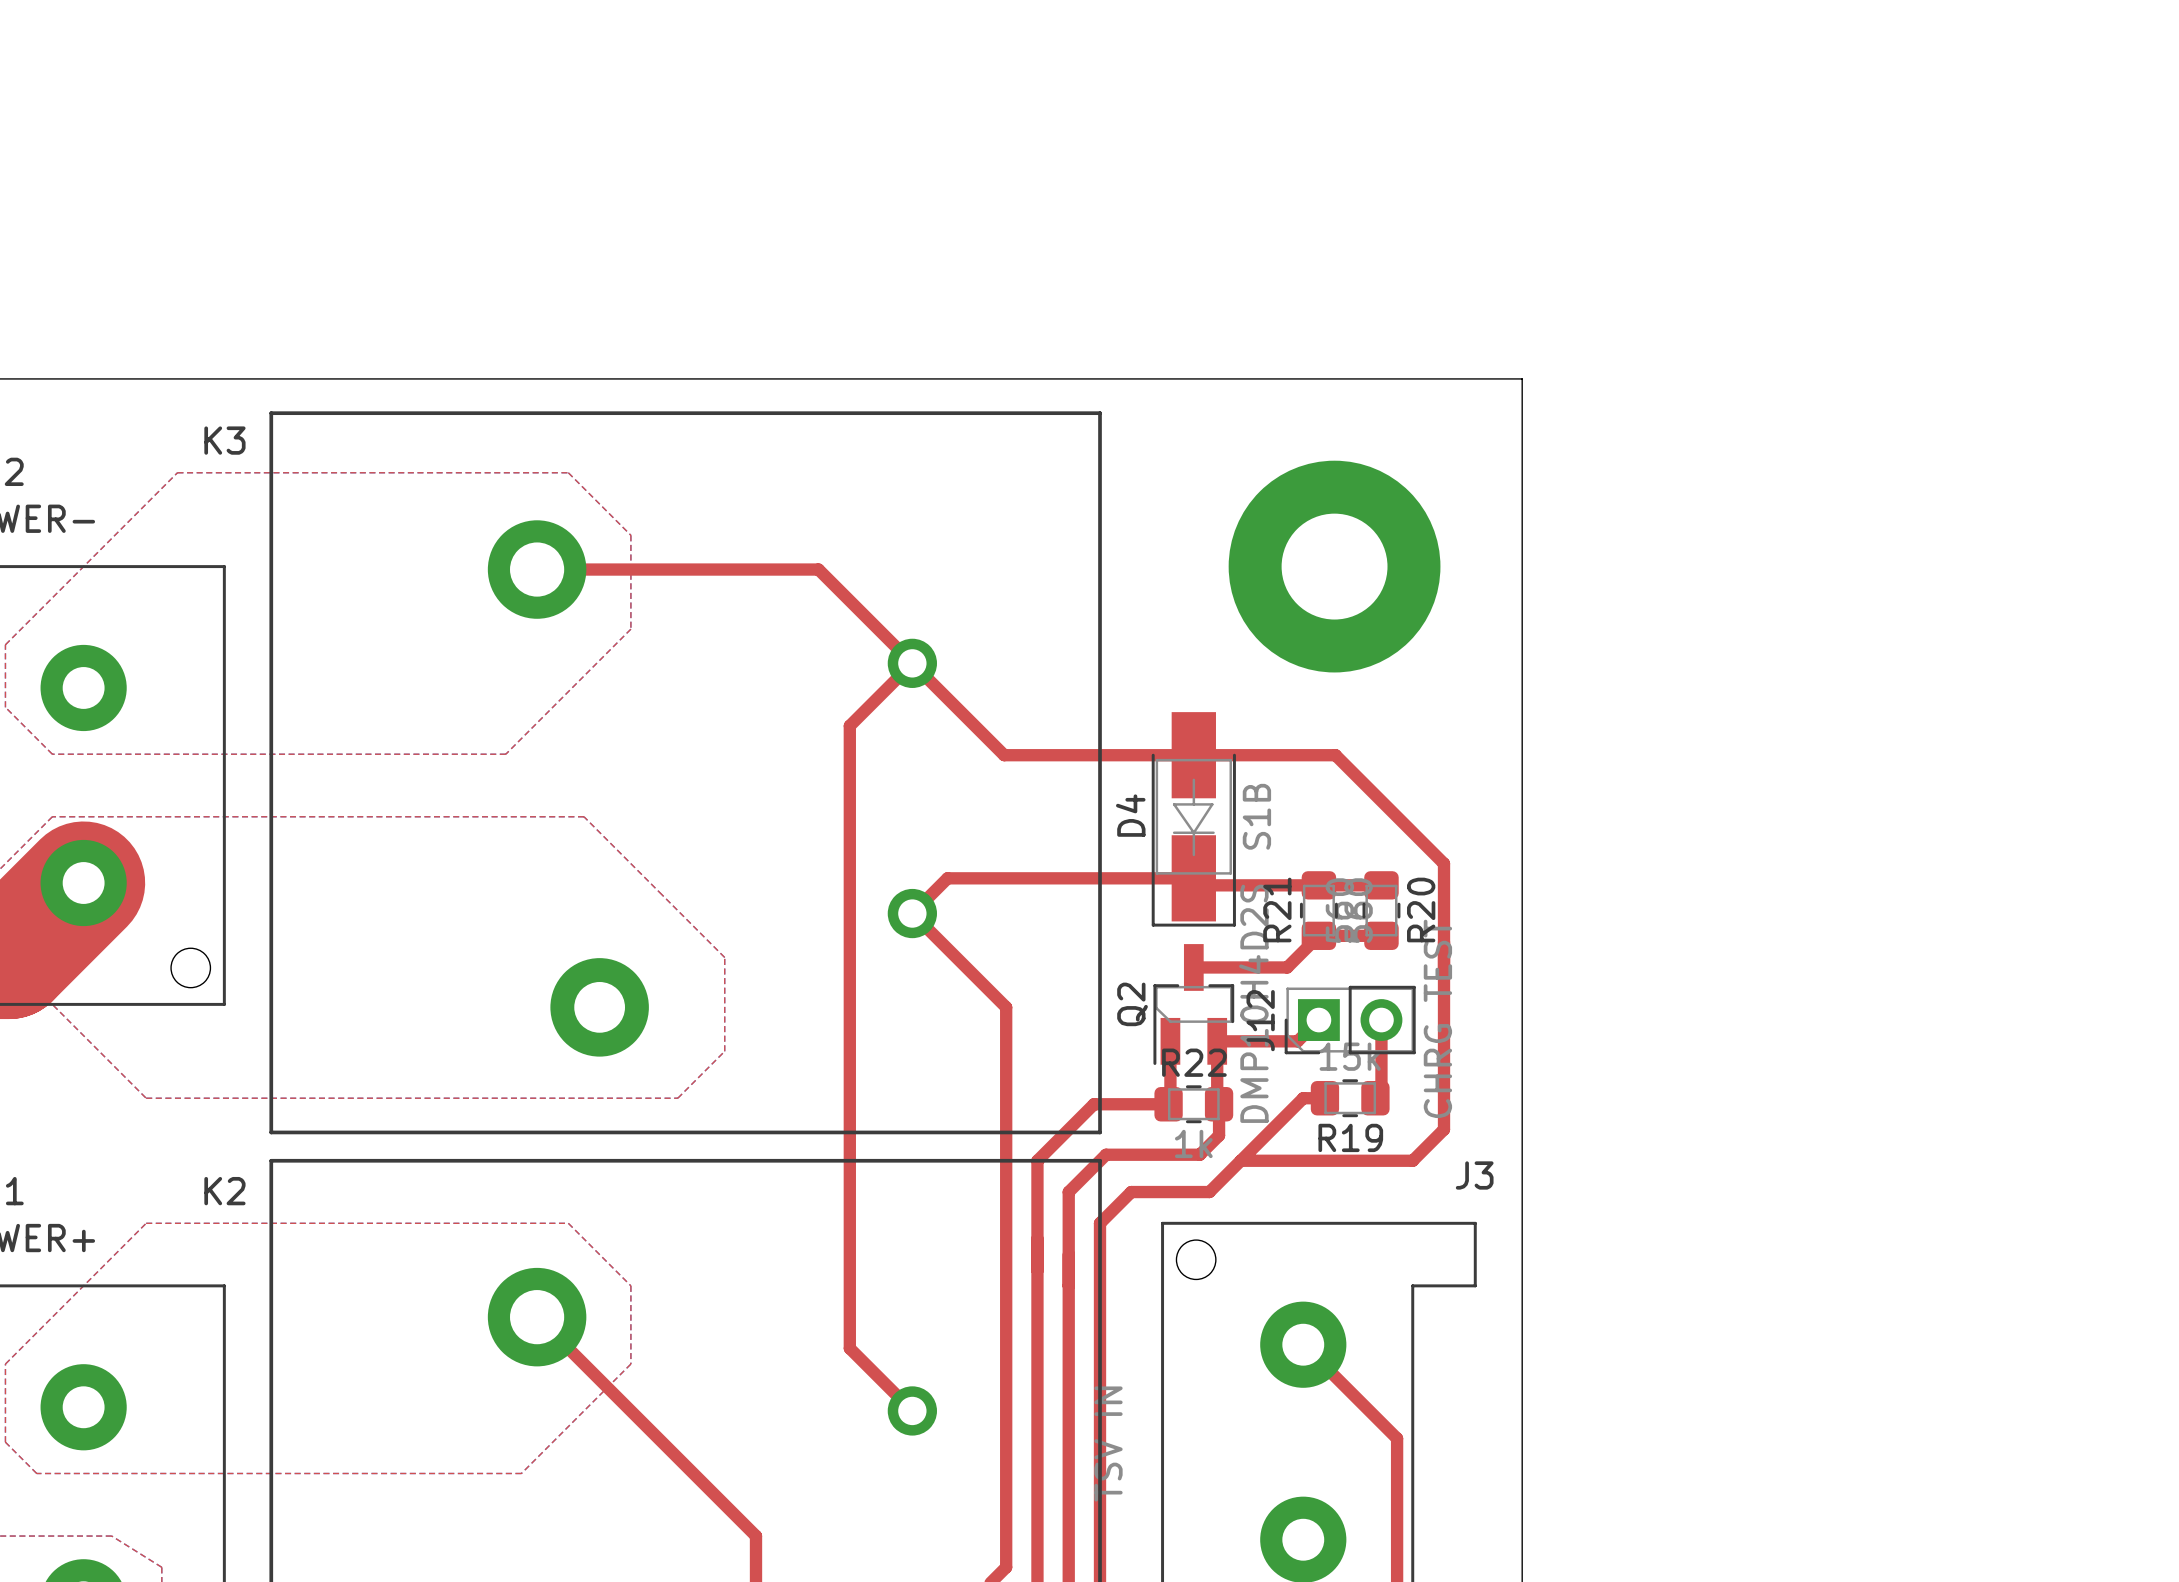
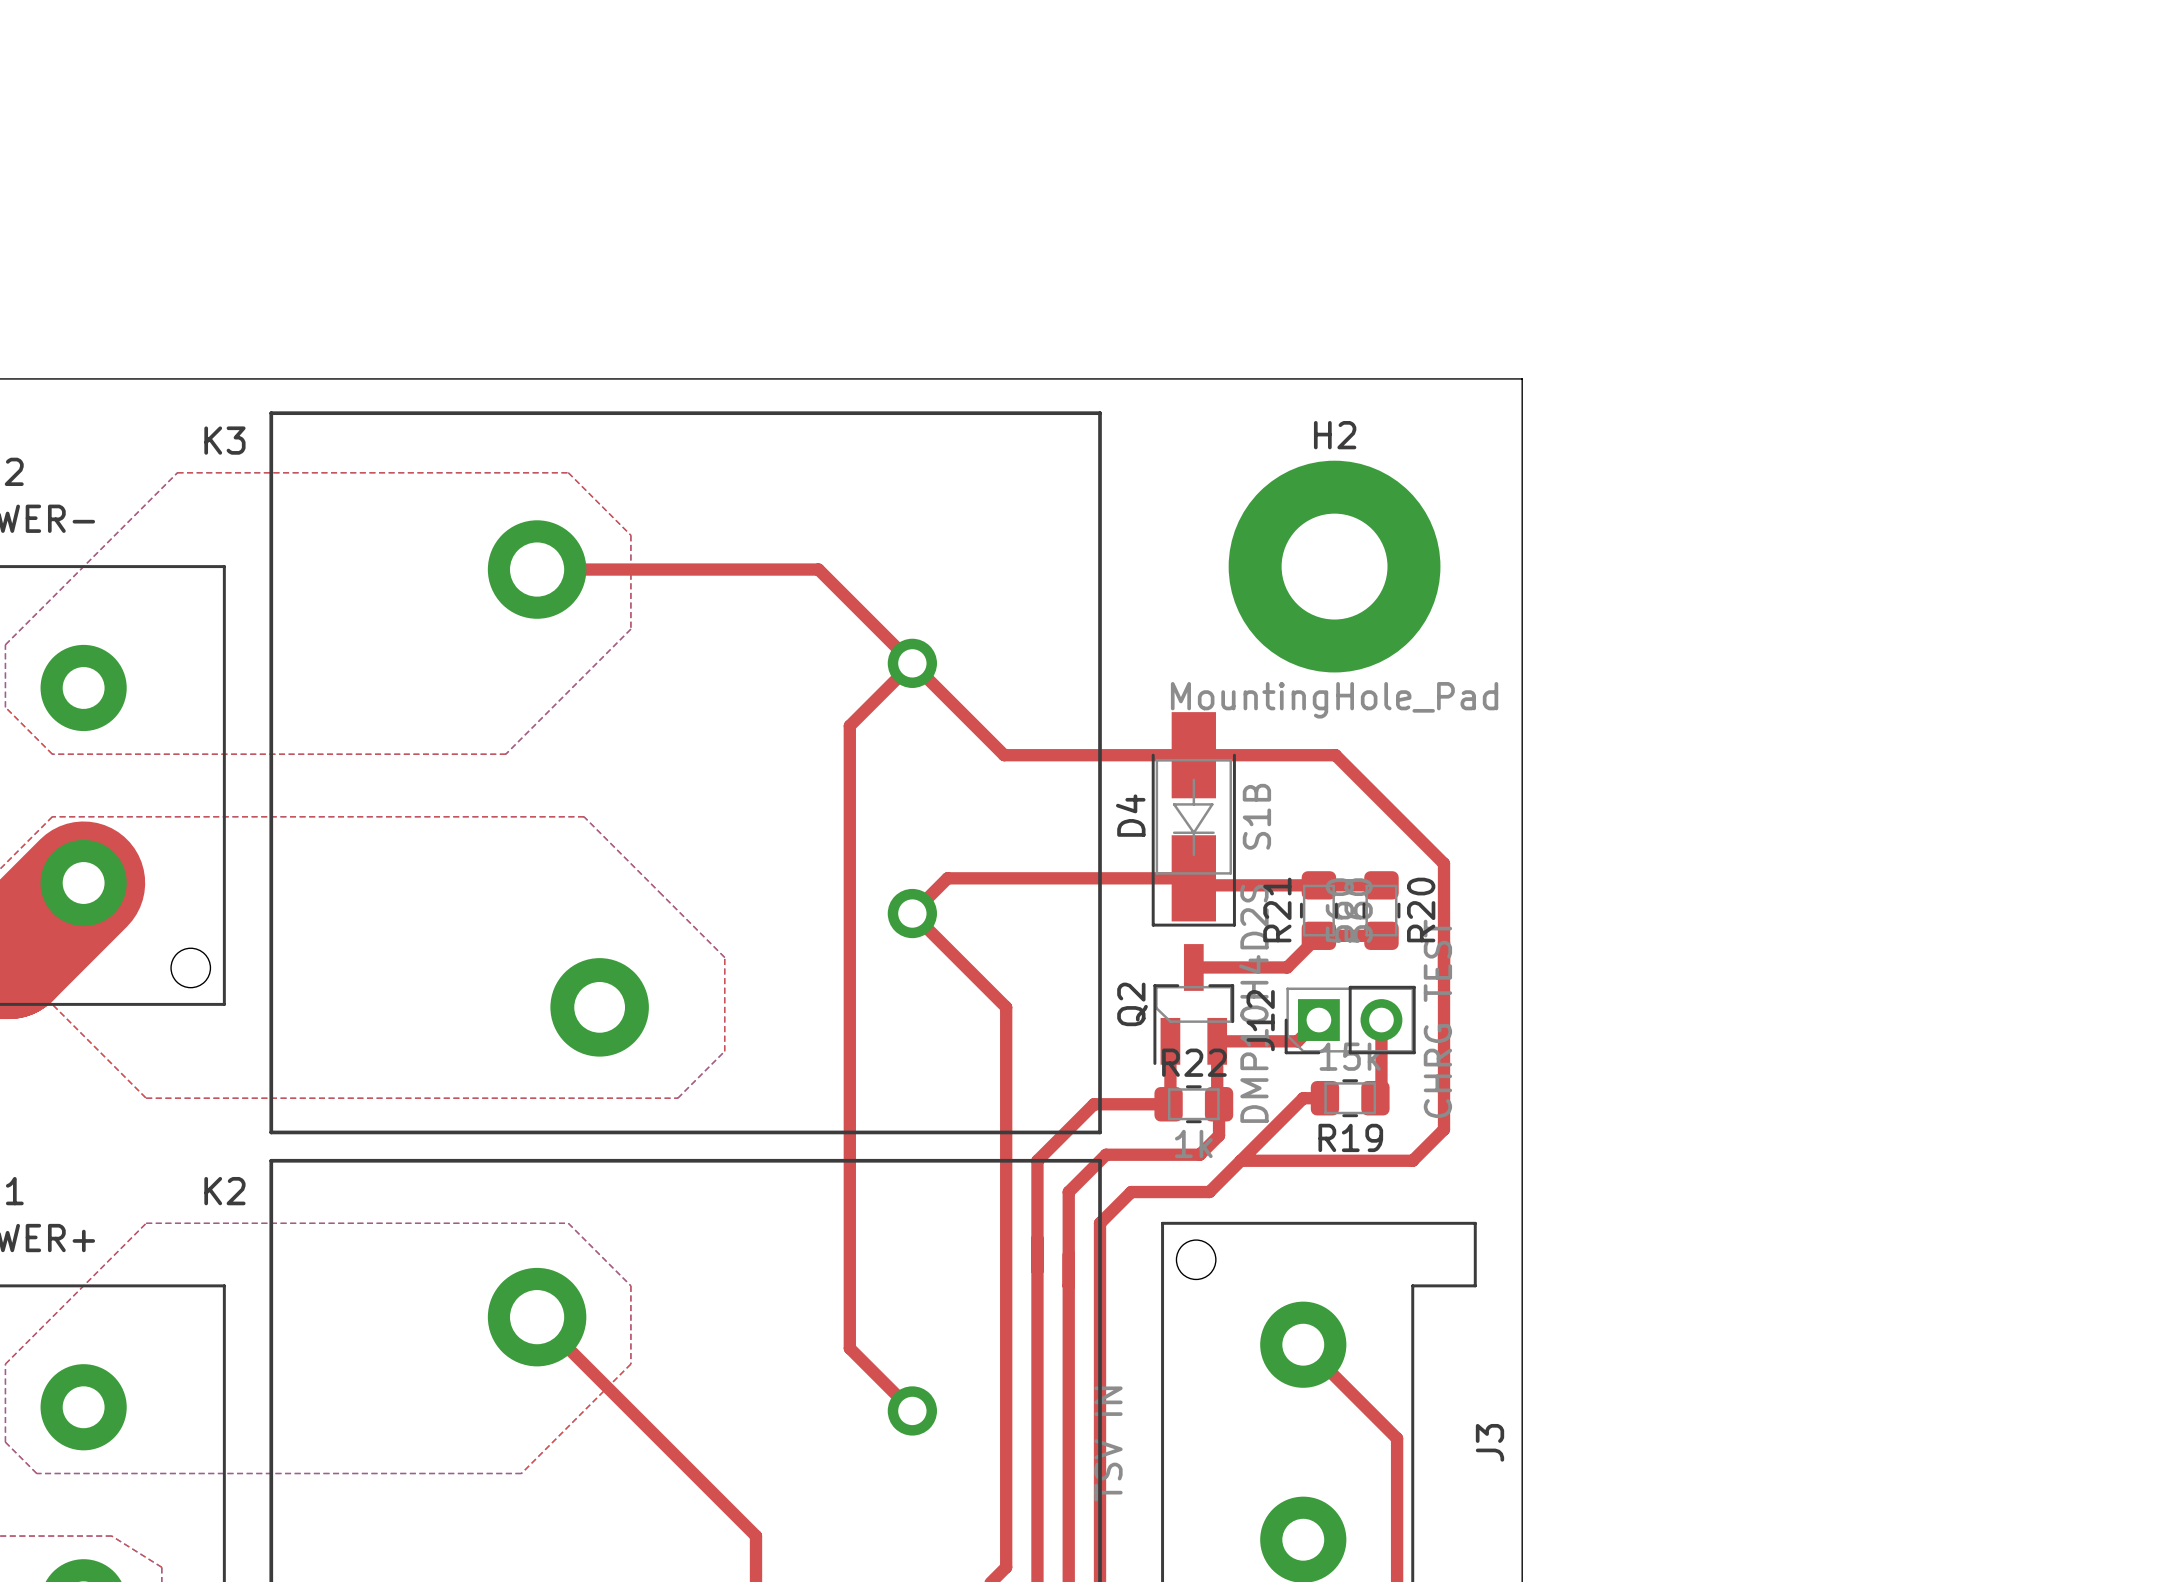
H2 name: none -> H2 (1335, 435)
H2 value: none -> MountingHole_Pad (1334, 700)
J3 name rotation: 0° (1474, 1175) -> 90° counterclockwise (1489, 1442)
J3 name position: J3 (1474, 1175) -> J3 (1489, 1442)

